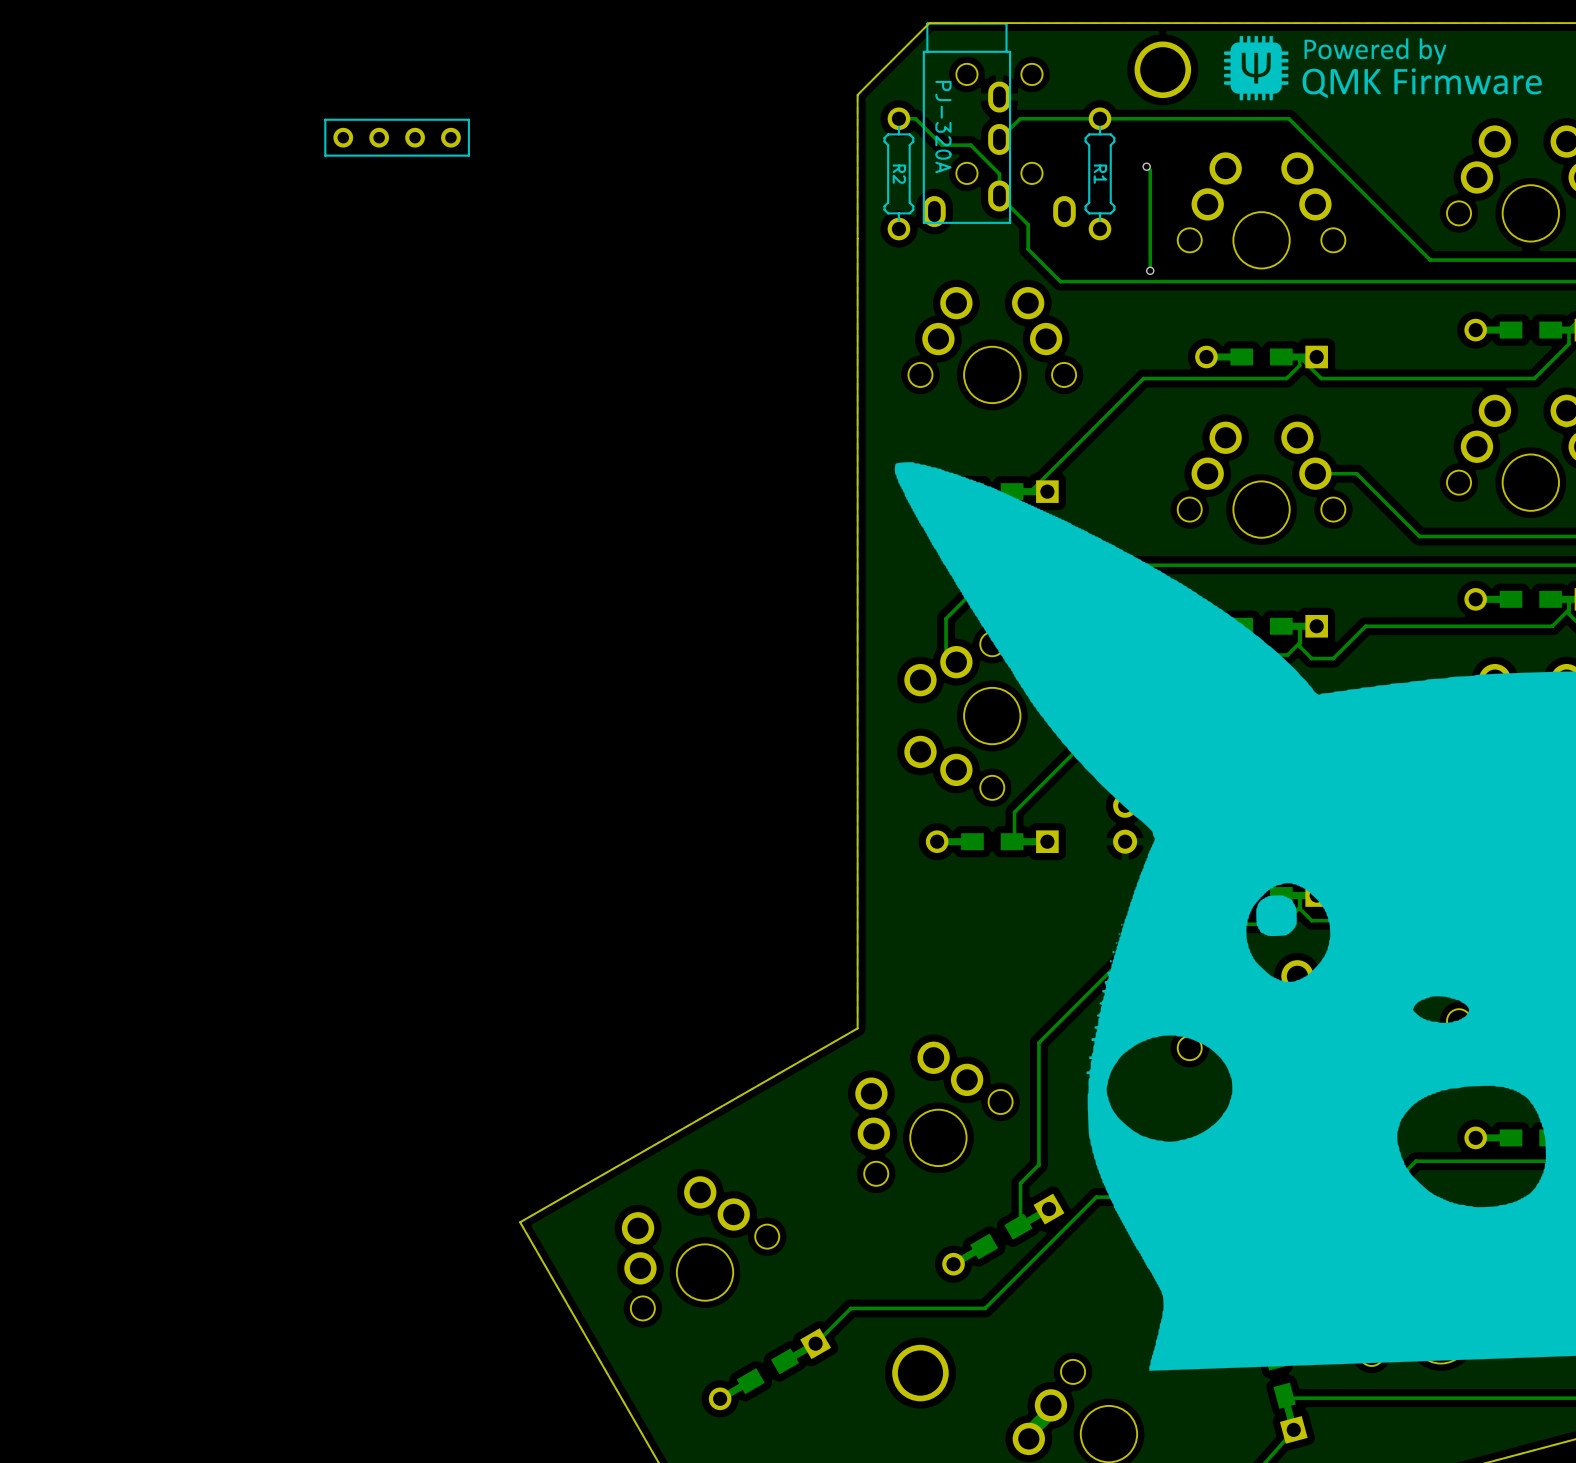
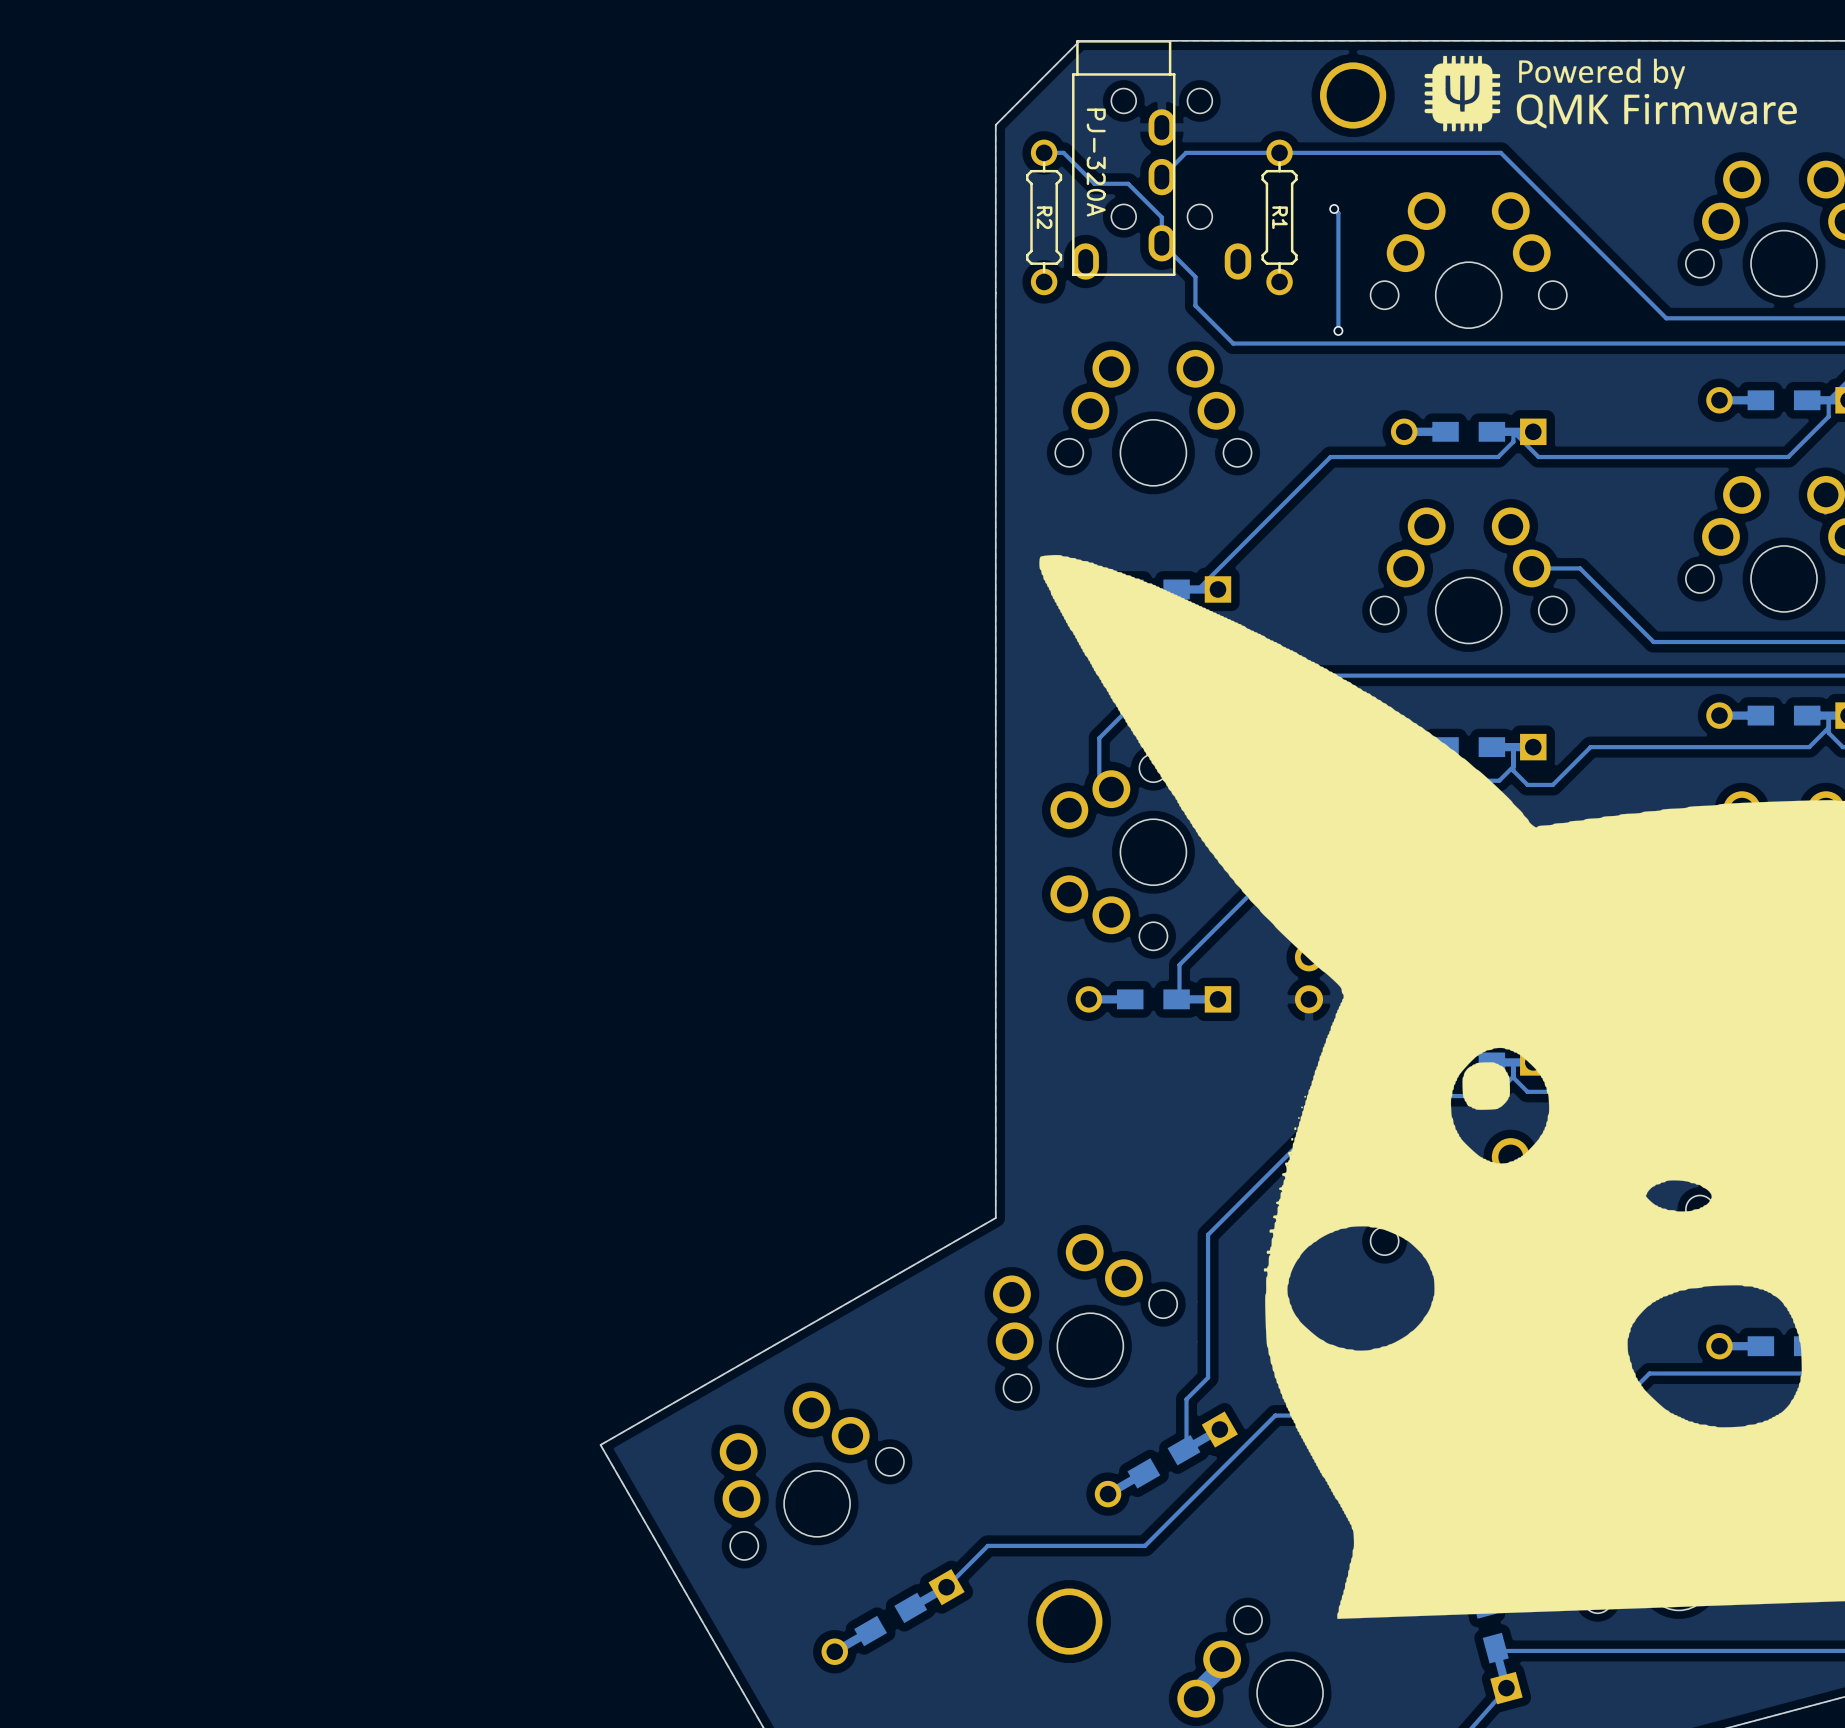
part: (397, 137) -> none

